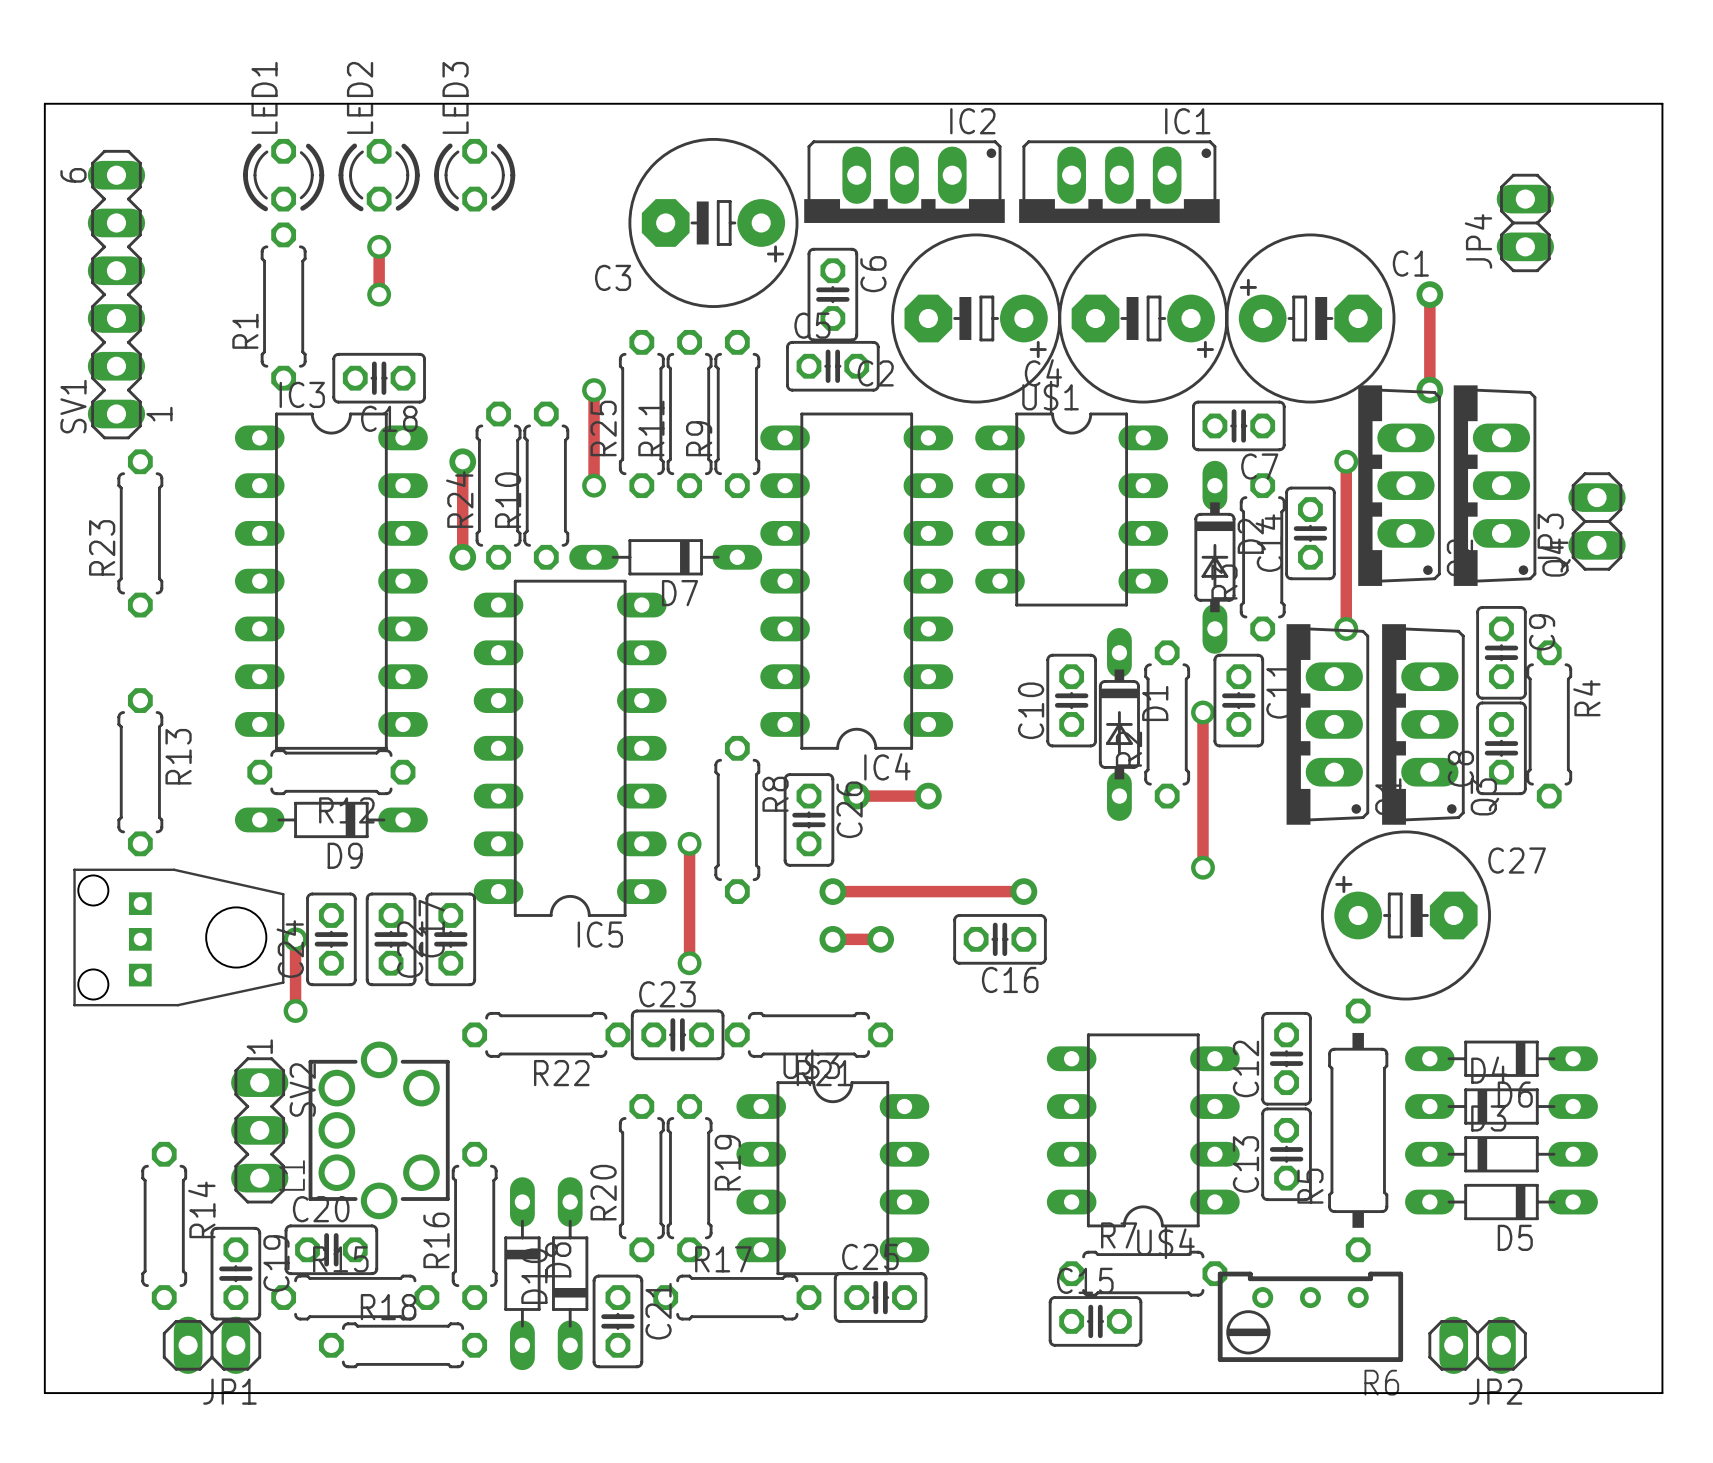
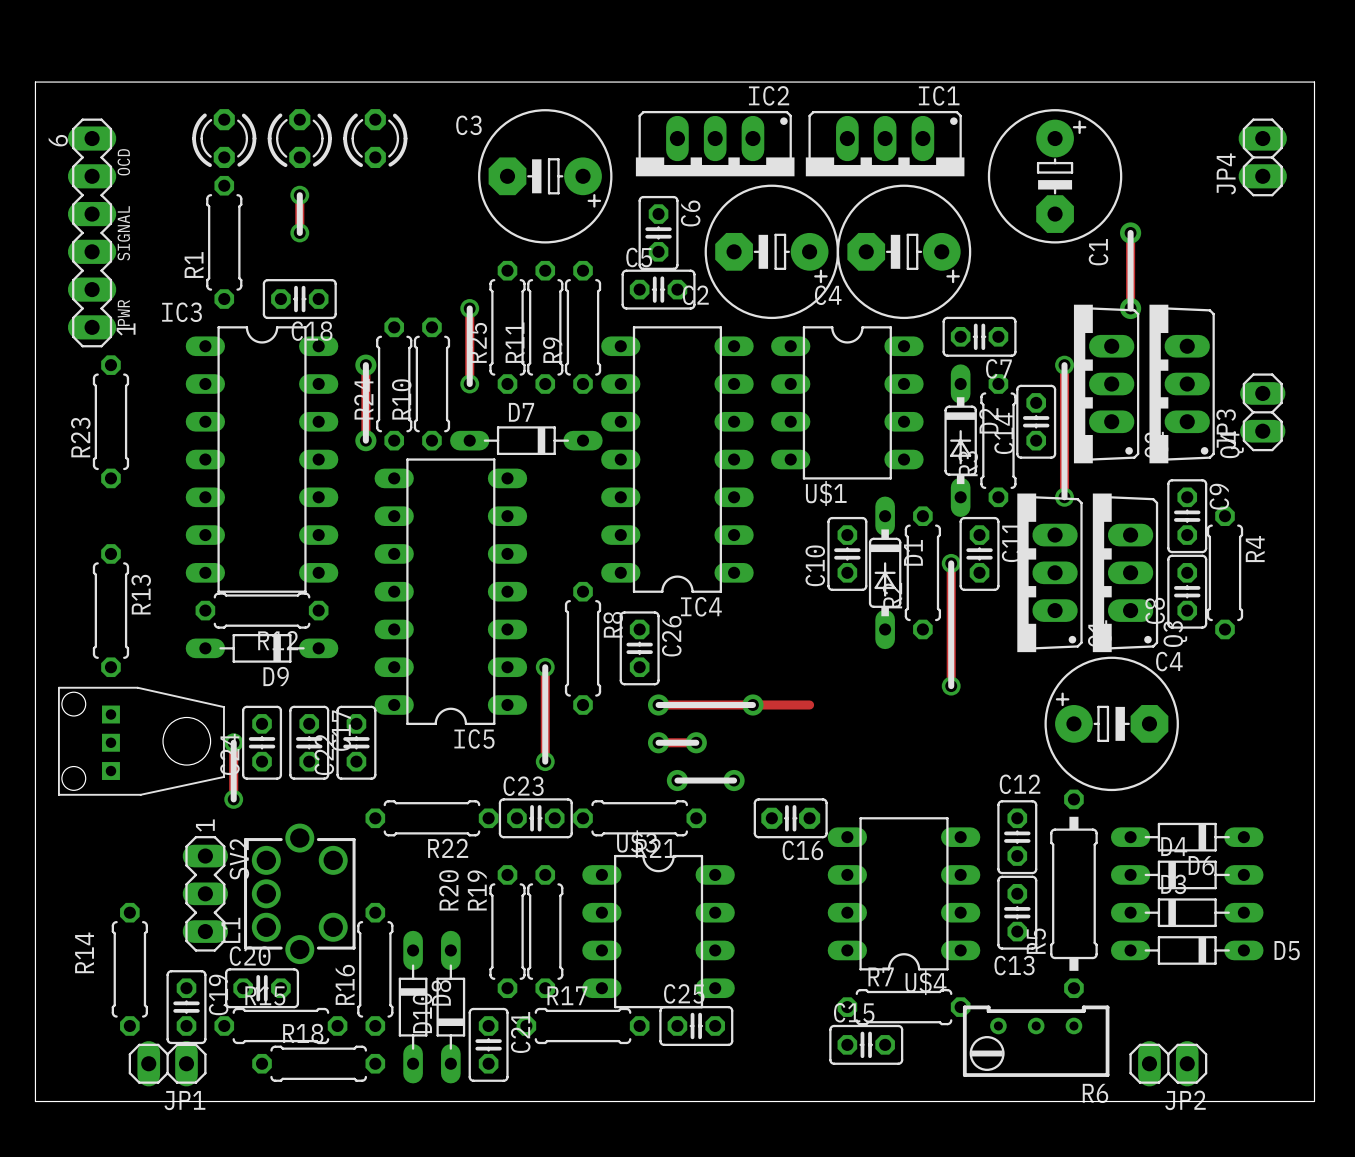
JP4 footprint: [1496, 173, 1555, 273] -> [1238, 118, 1287, 197]
LED1: (283, 175) -> none
part: none -> (224, 138)
LED2: (379, 175) -> none
part: none -> (299, 138)
LED3: (474, 175) -> none
part: none -> (375, 138)
text: none -> OCD (123, 162)
C3 position: (713, 222) -> (545, 176)
line: none -> (299, 195) (299, 232)
C3 name position: C3 (613, 277) -> C3 (468, 125)
text: none -> SIGNAL (123, 233)
SV1: (116, 294) -> none
part: none -> (92, 232)
line: none -> (1130, 232) (1130, 308)
C1 rotation: 0° (1310, 318) -> 90° clockwise (1055, 176)
line: none -> (469, 308) (469, 384)
text: none -> PWR (123, 313)
IC3 name position: IC3 (302, 394) -> IC3 (182, 312)
U$1 name position: U$1 (1050, 397) -> U$1 (826, 493)
line: none -> (365, 365) (365, 440)
line: none -> (1064, 365) (1064, 497)
D7 name position: D7 (679, 593) -> D7 (521, 412)
line: none -> (951, 563) (951, 686)
track: (856, 796) (928, 796) -> none
via: (856, 796) -> none
via: (928, 796) -> none
line: none -> (545, 667) (545, 761)
C27 name: C27 (1517, 860) -> C4 (1169, 661)
line: none -> (658, 705) (752, 705)
via: none -> (752, 705)
via: (1023, 891) -> none
C16 footprint: [953, 914, 1047, 965] -> [753, 798, 828, 839]
line: none -> (233, 742) (233, 799)
line: none -> (658, 742) (696, 742)
line: none -> (677, 780) (734, 780)
via: none -> (677, 780)
via: none -> (734, 780)
C12 name rotation: 0° (1245, 1068) -> 90° clockwise (1020, 784)
C12 name position: C12 (1245, 1068) -> C12 (1020, 784)
R19 name position: R19 (727, 1162) -> R19 (477, 890)
C13 name rotation: 0° (1245, 1164) -> 90° clockwise (1014, 965)
C13 name position: C13 (1245, 1164) -> C13 (1014, 965)
R20 name position: R20 (603, 1192) -> R20 (448, 890)
R14 name position: R14 (201, 1209) -> R14 (84, 952)
D5 name position: D5 (1515, 1237) -> D5 (1287, 950)

